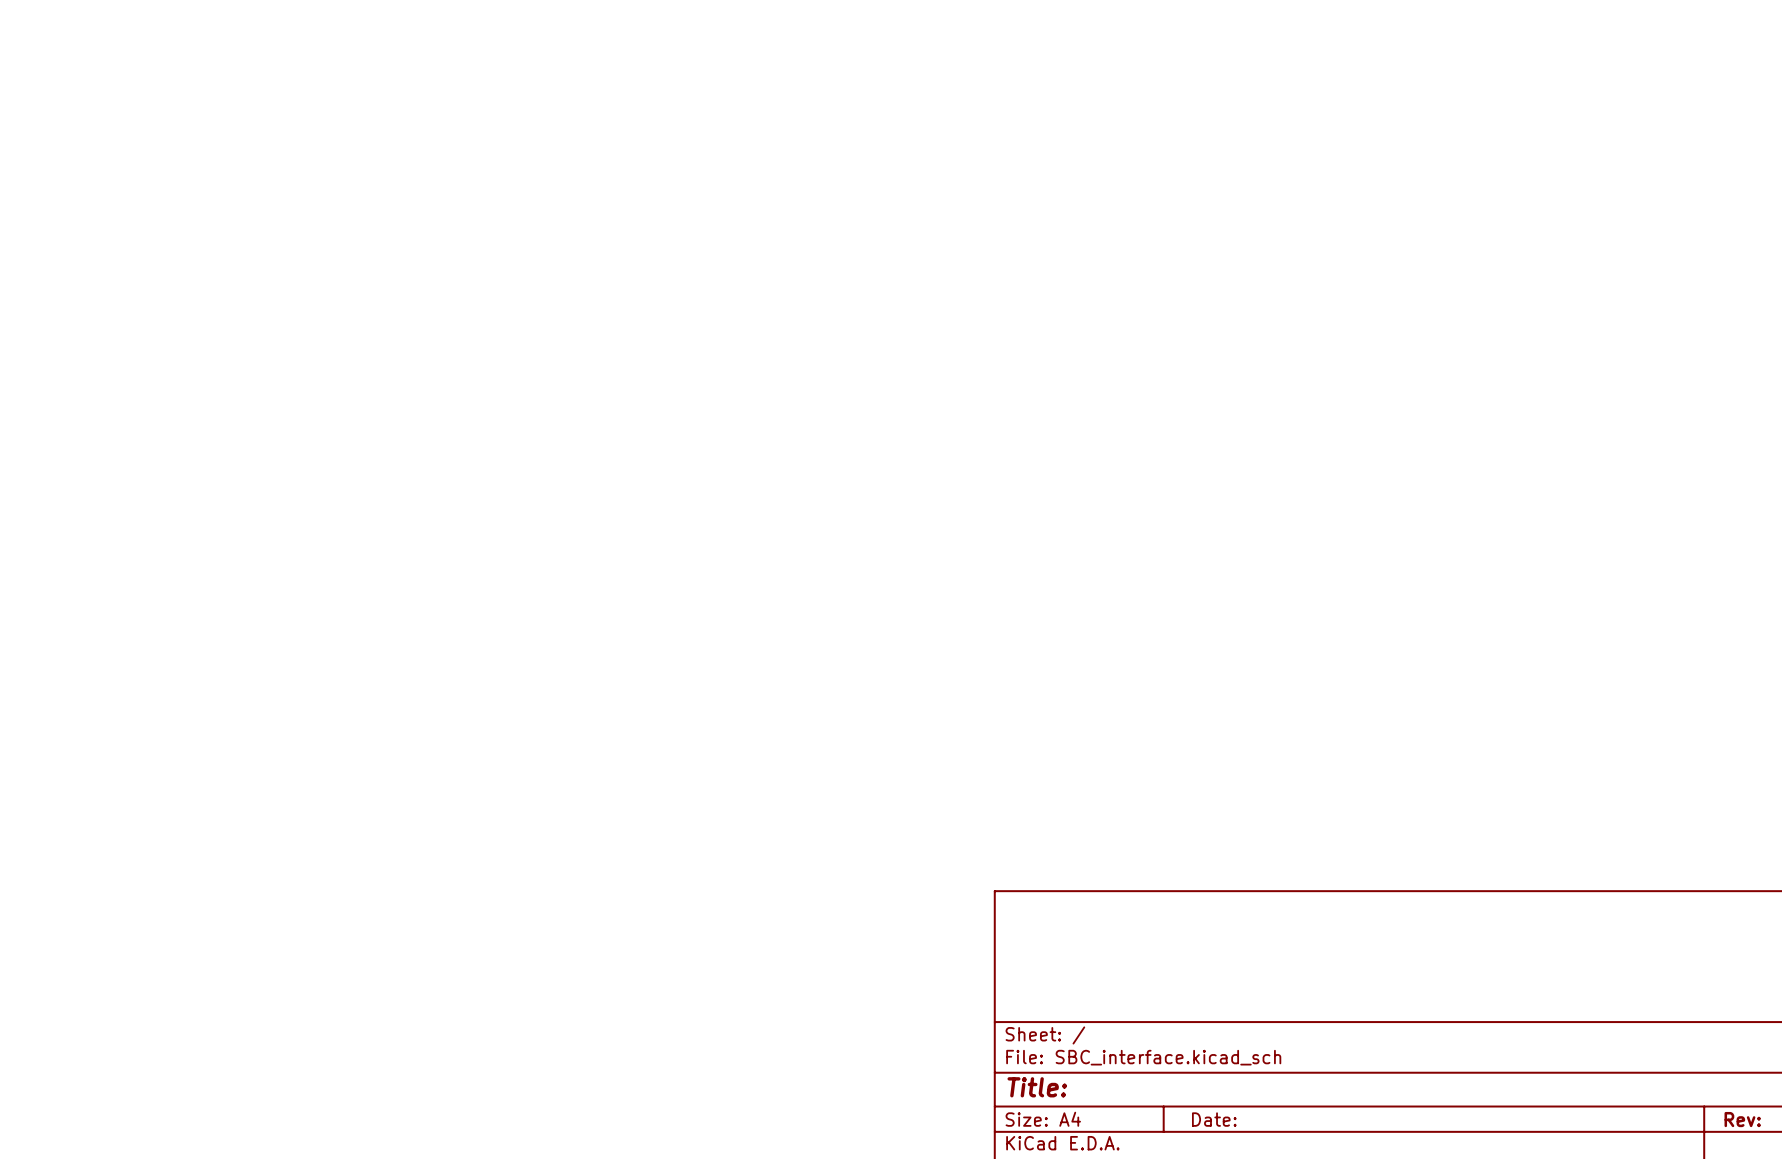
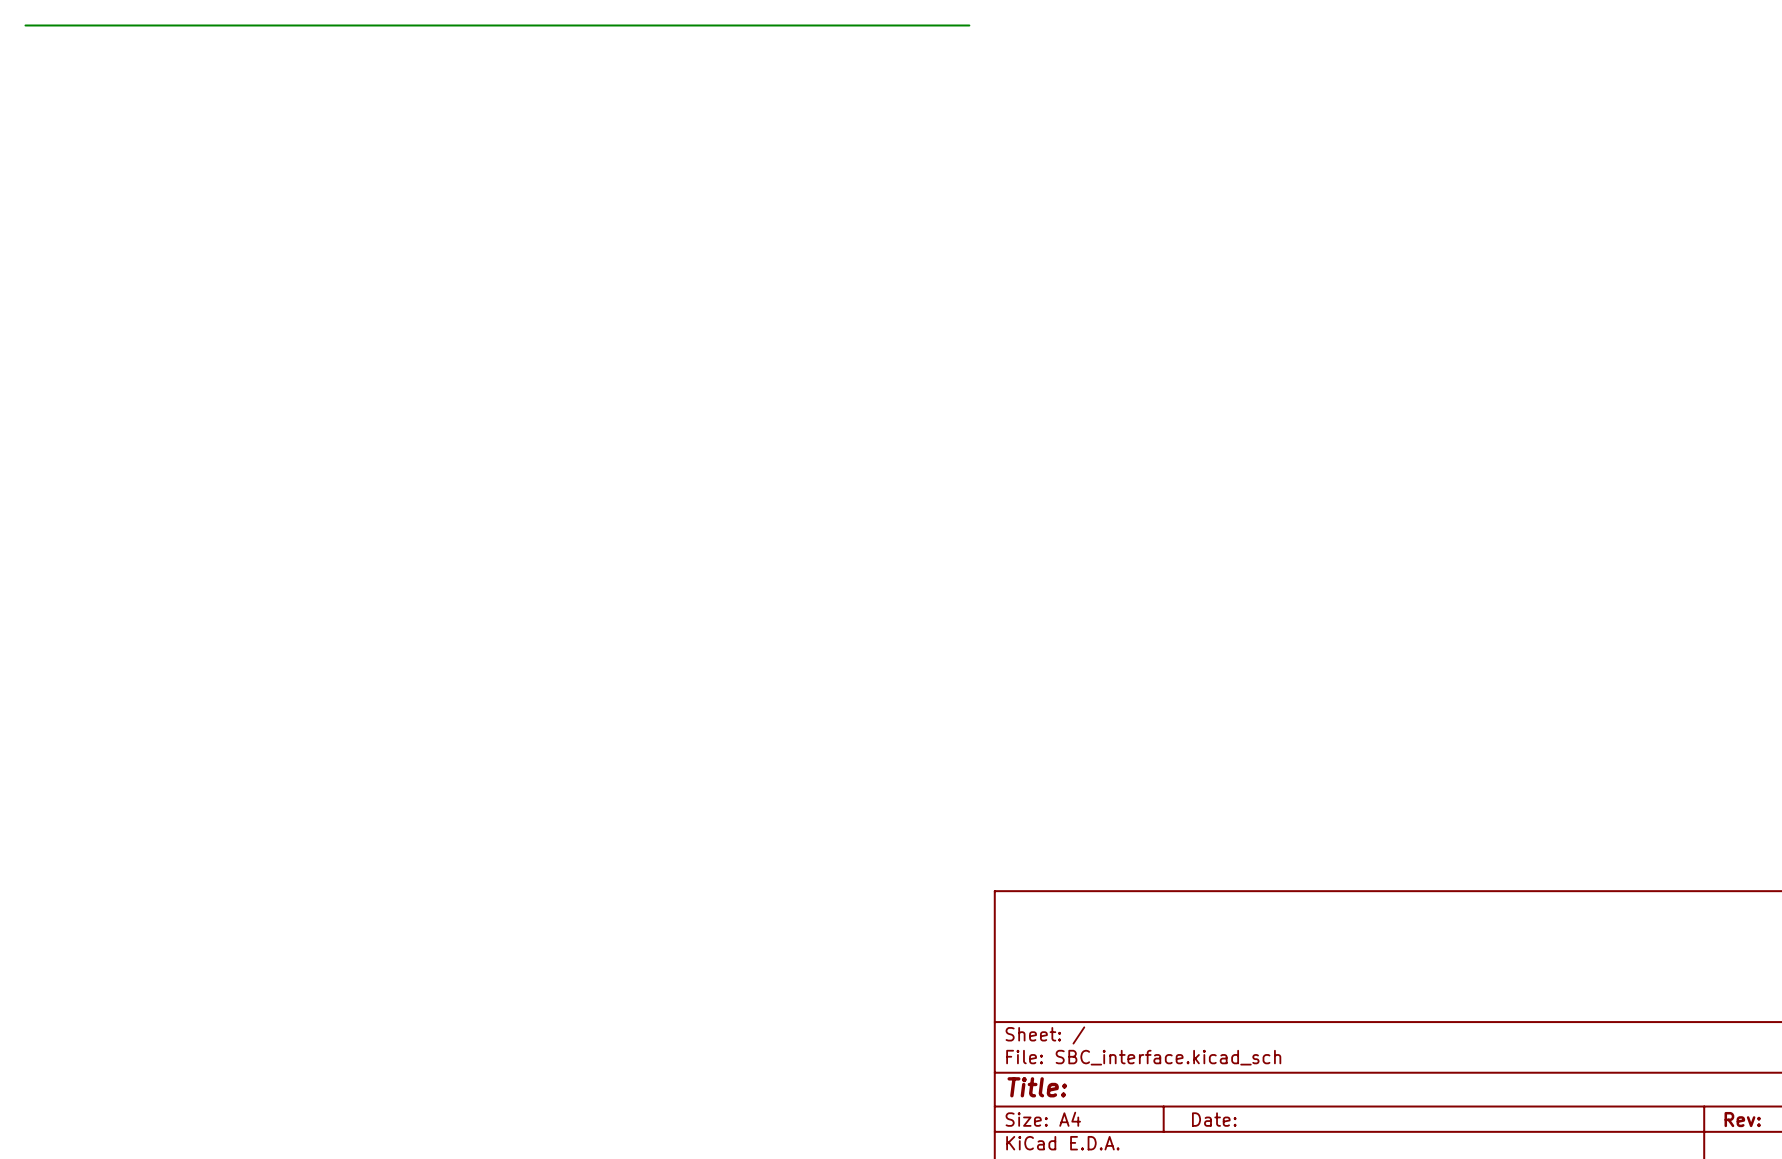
wire: none -> (25, 25) (969, 25)

